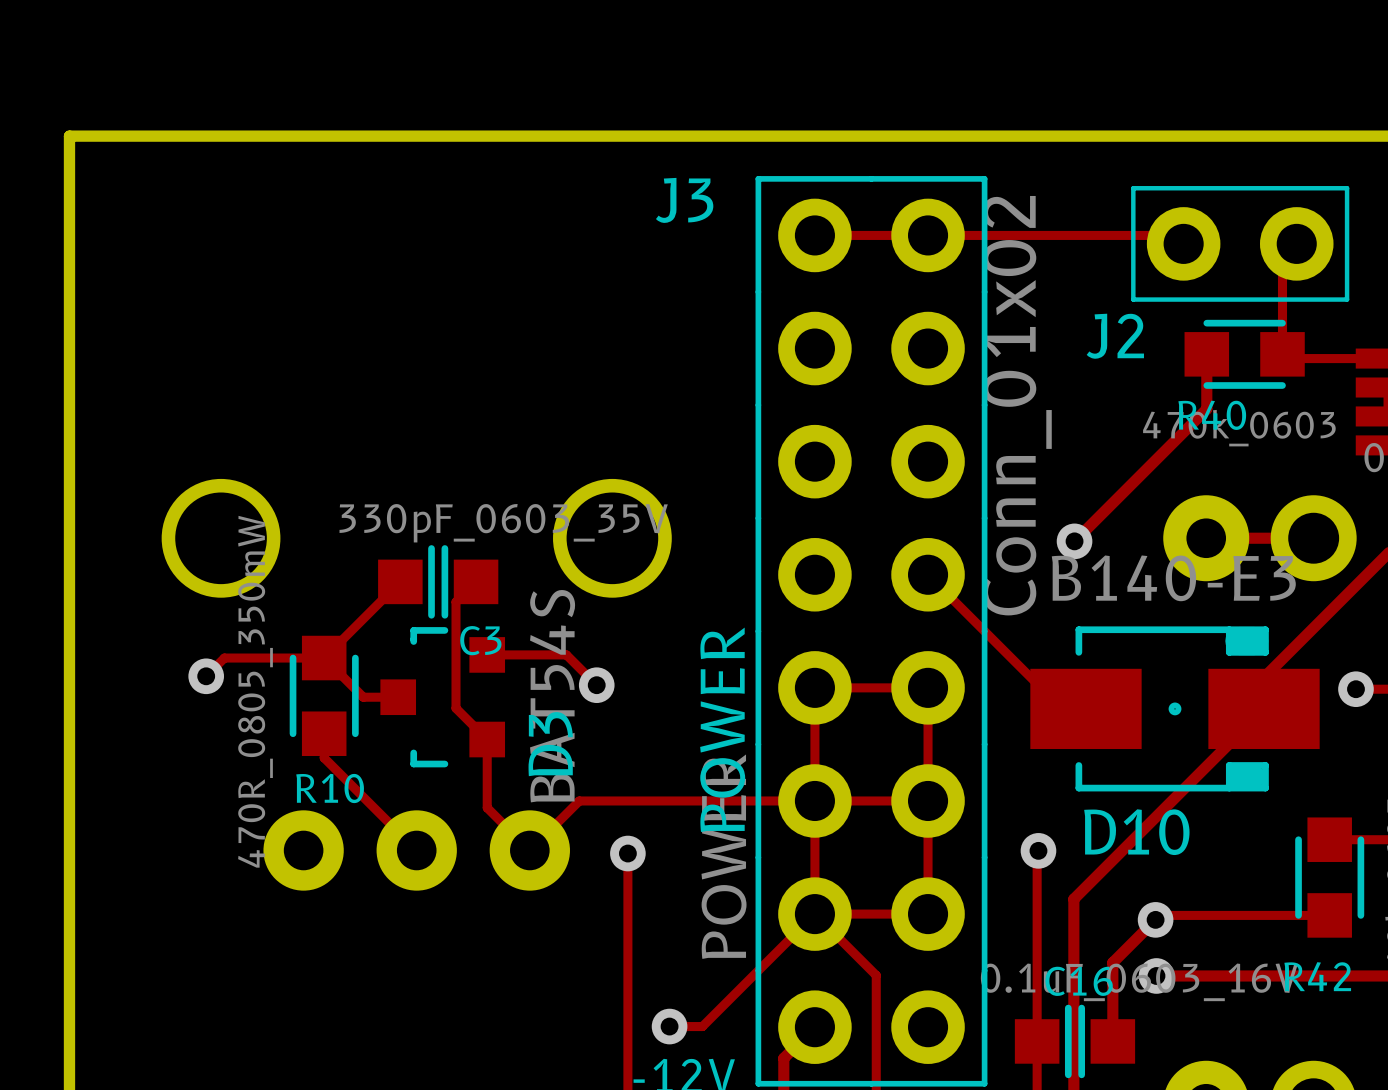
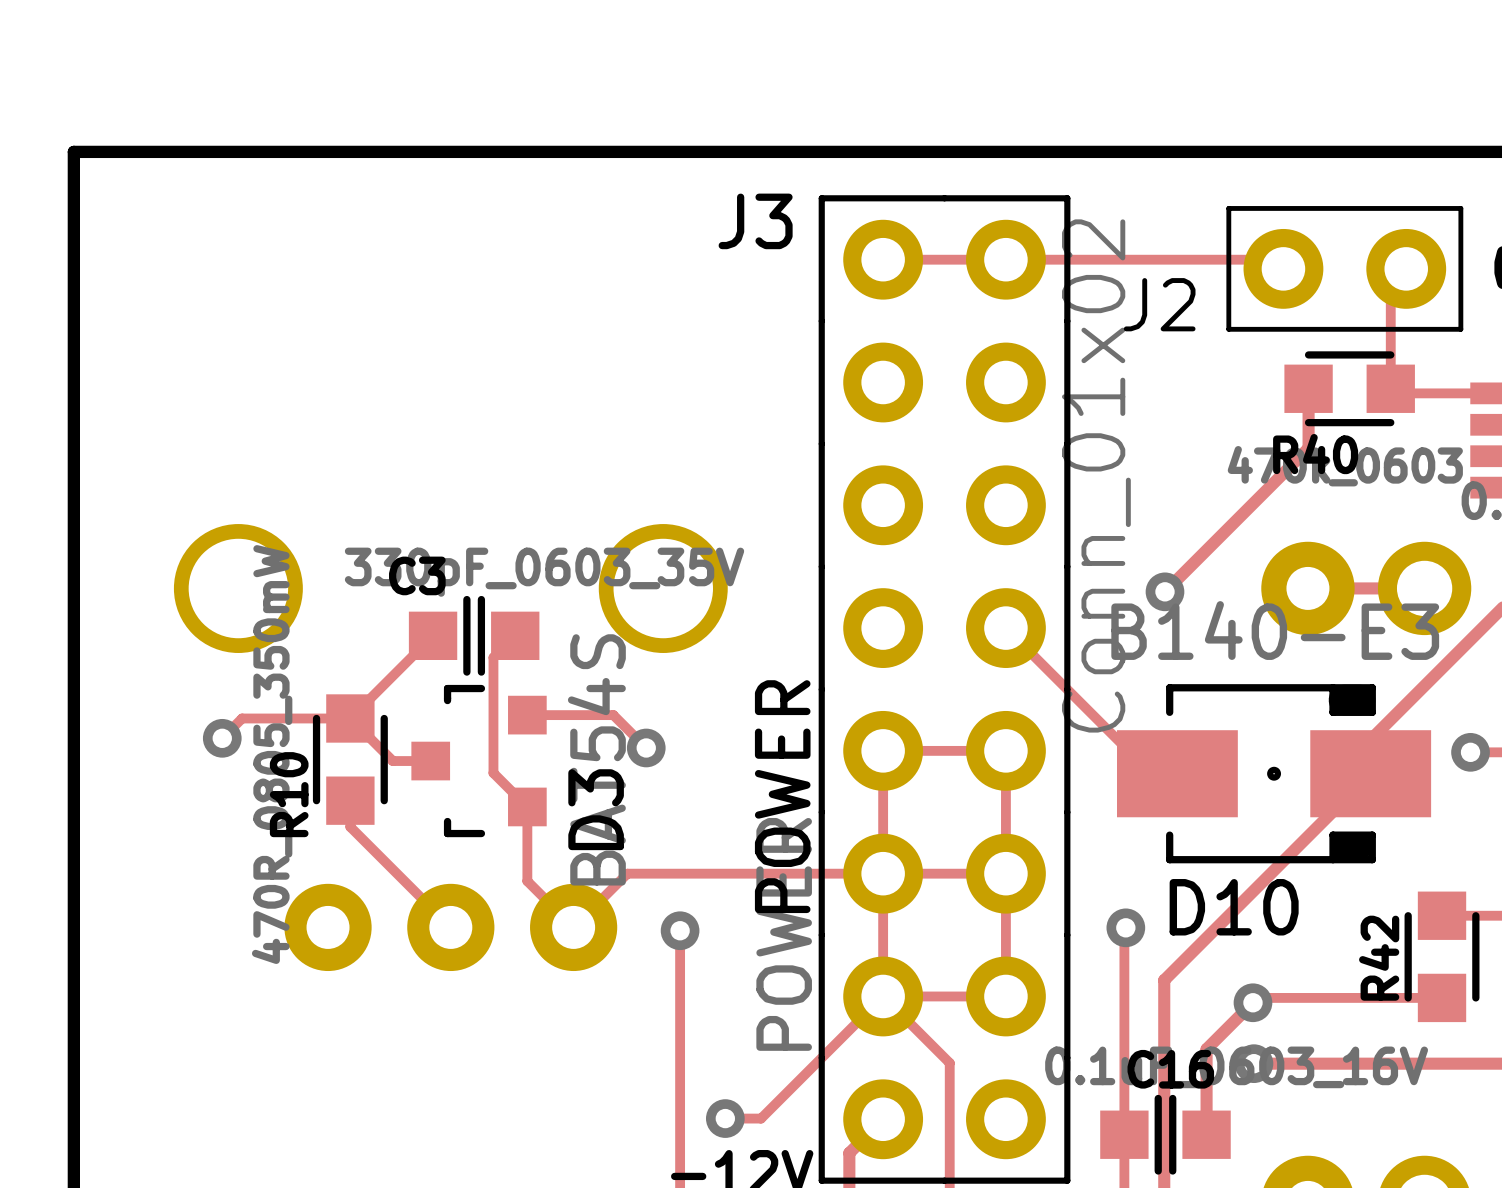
J2 name position: J2 (1115, 336) -> J2 (1159, 304)
C3 name position: C3 (480, 640) -> C3 (417, 575)
R10 name rotation: 0° (330, 788) -> 90° counterclockwise (289, 794)
R42 name rotation: 0° (1317, 976) -> 90° counterclockwise (1379, 958)
R42 name position: R42 (1317, 976) -> R42 (1379, 958)

